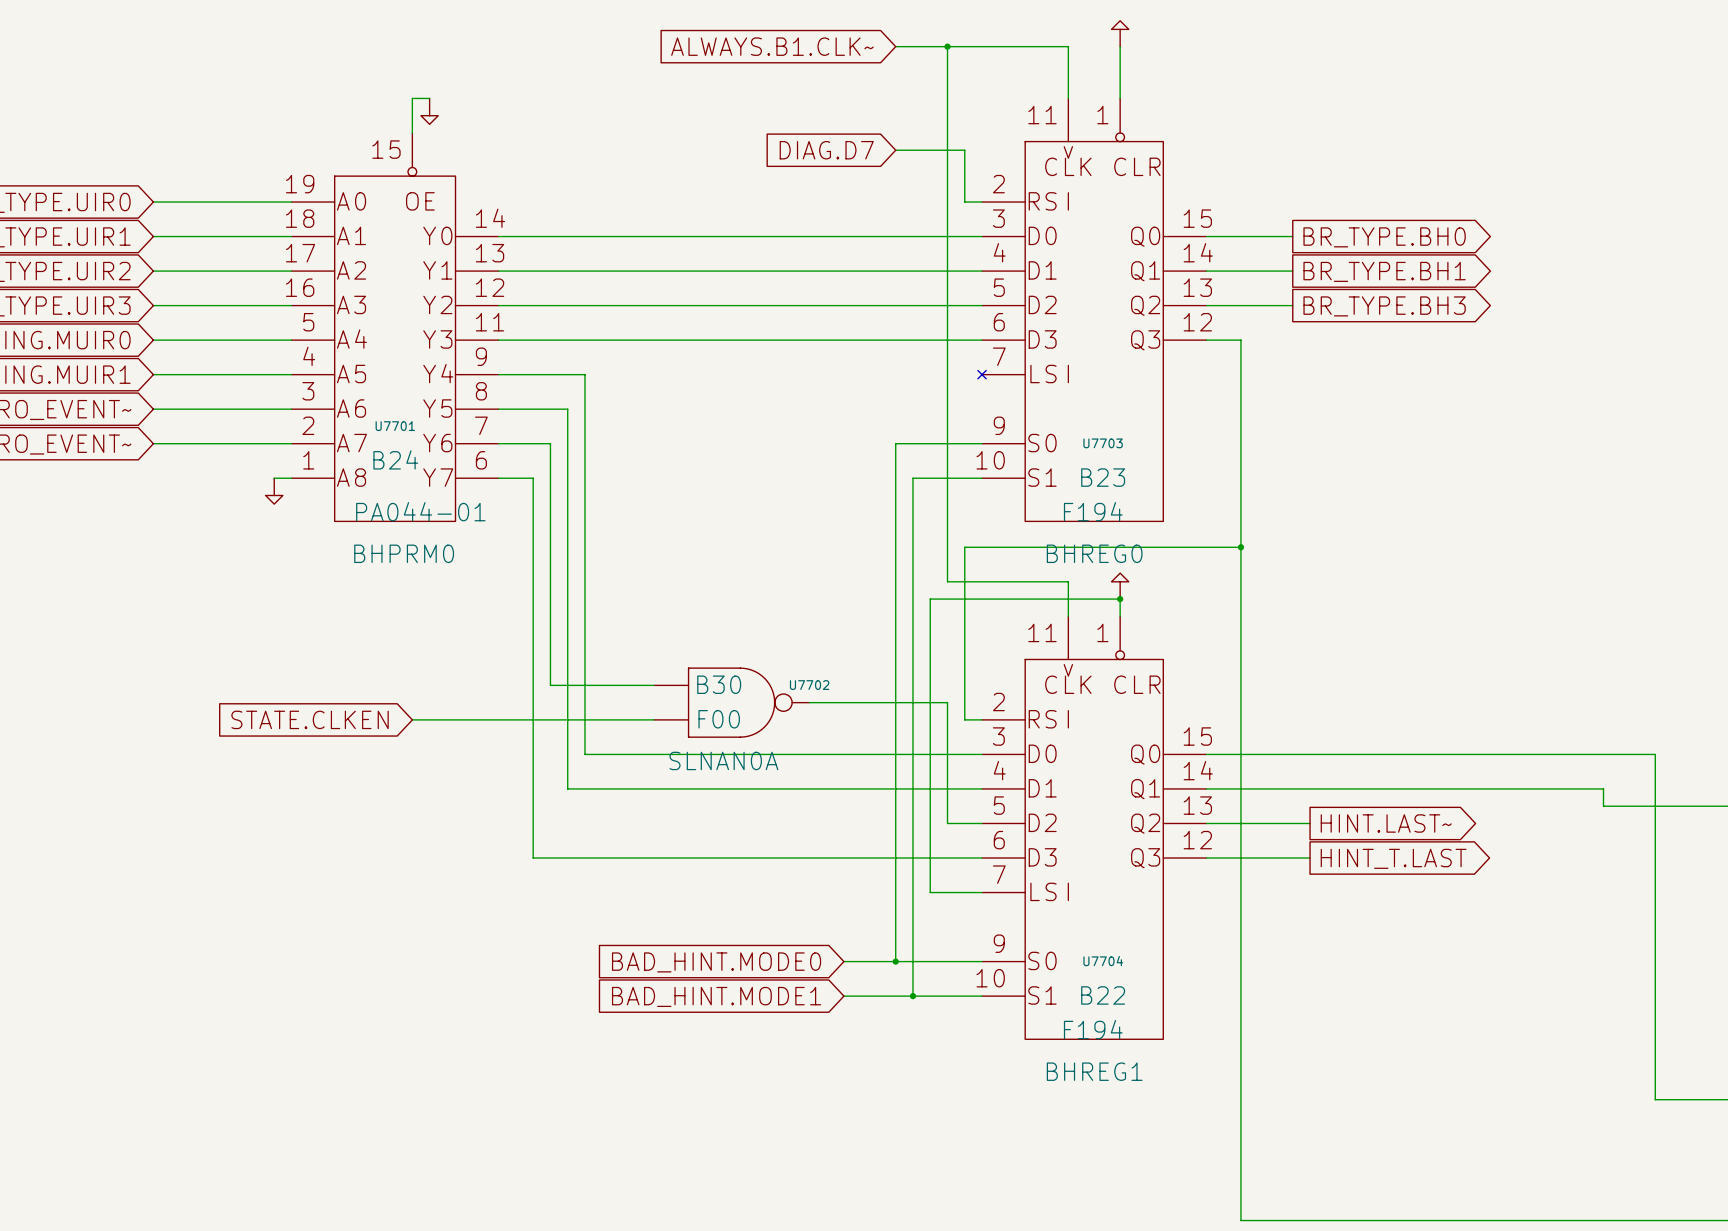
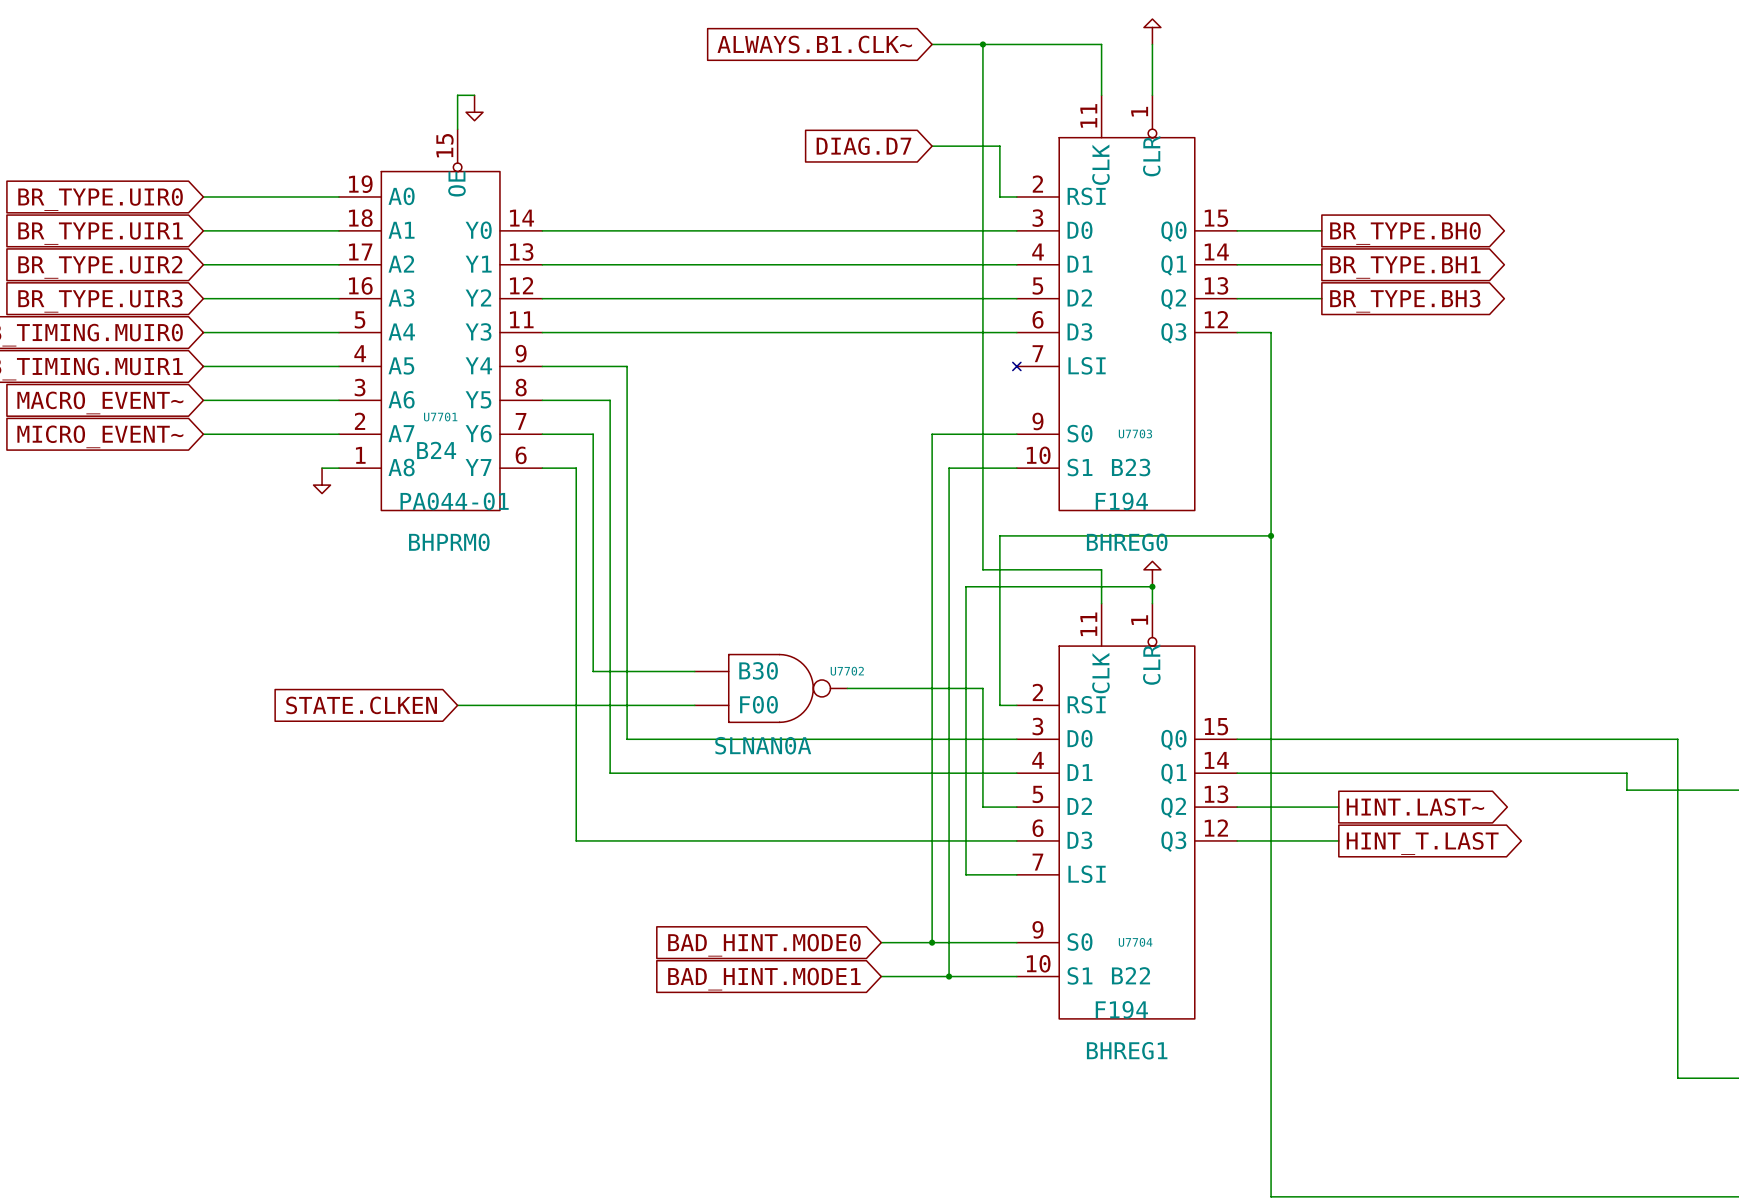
U7703 symbol: [982, 98, 1207, 522] -> [1016, 95, 1238, 511]
U7701 symbol: [291, 132, 499, 522] -> [338, 129, 543, 511]
U7704 symbol: [982, 616, 1207, 1040] -> [1016, 603, 1238, 1019]

